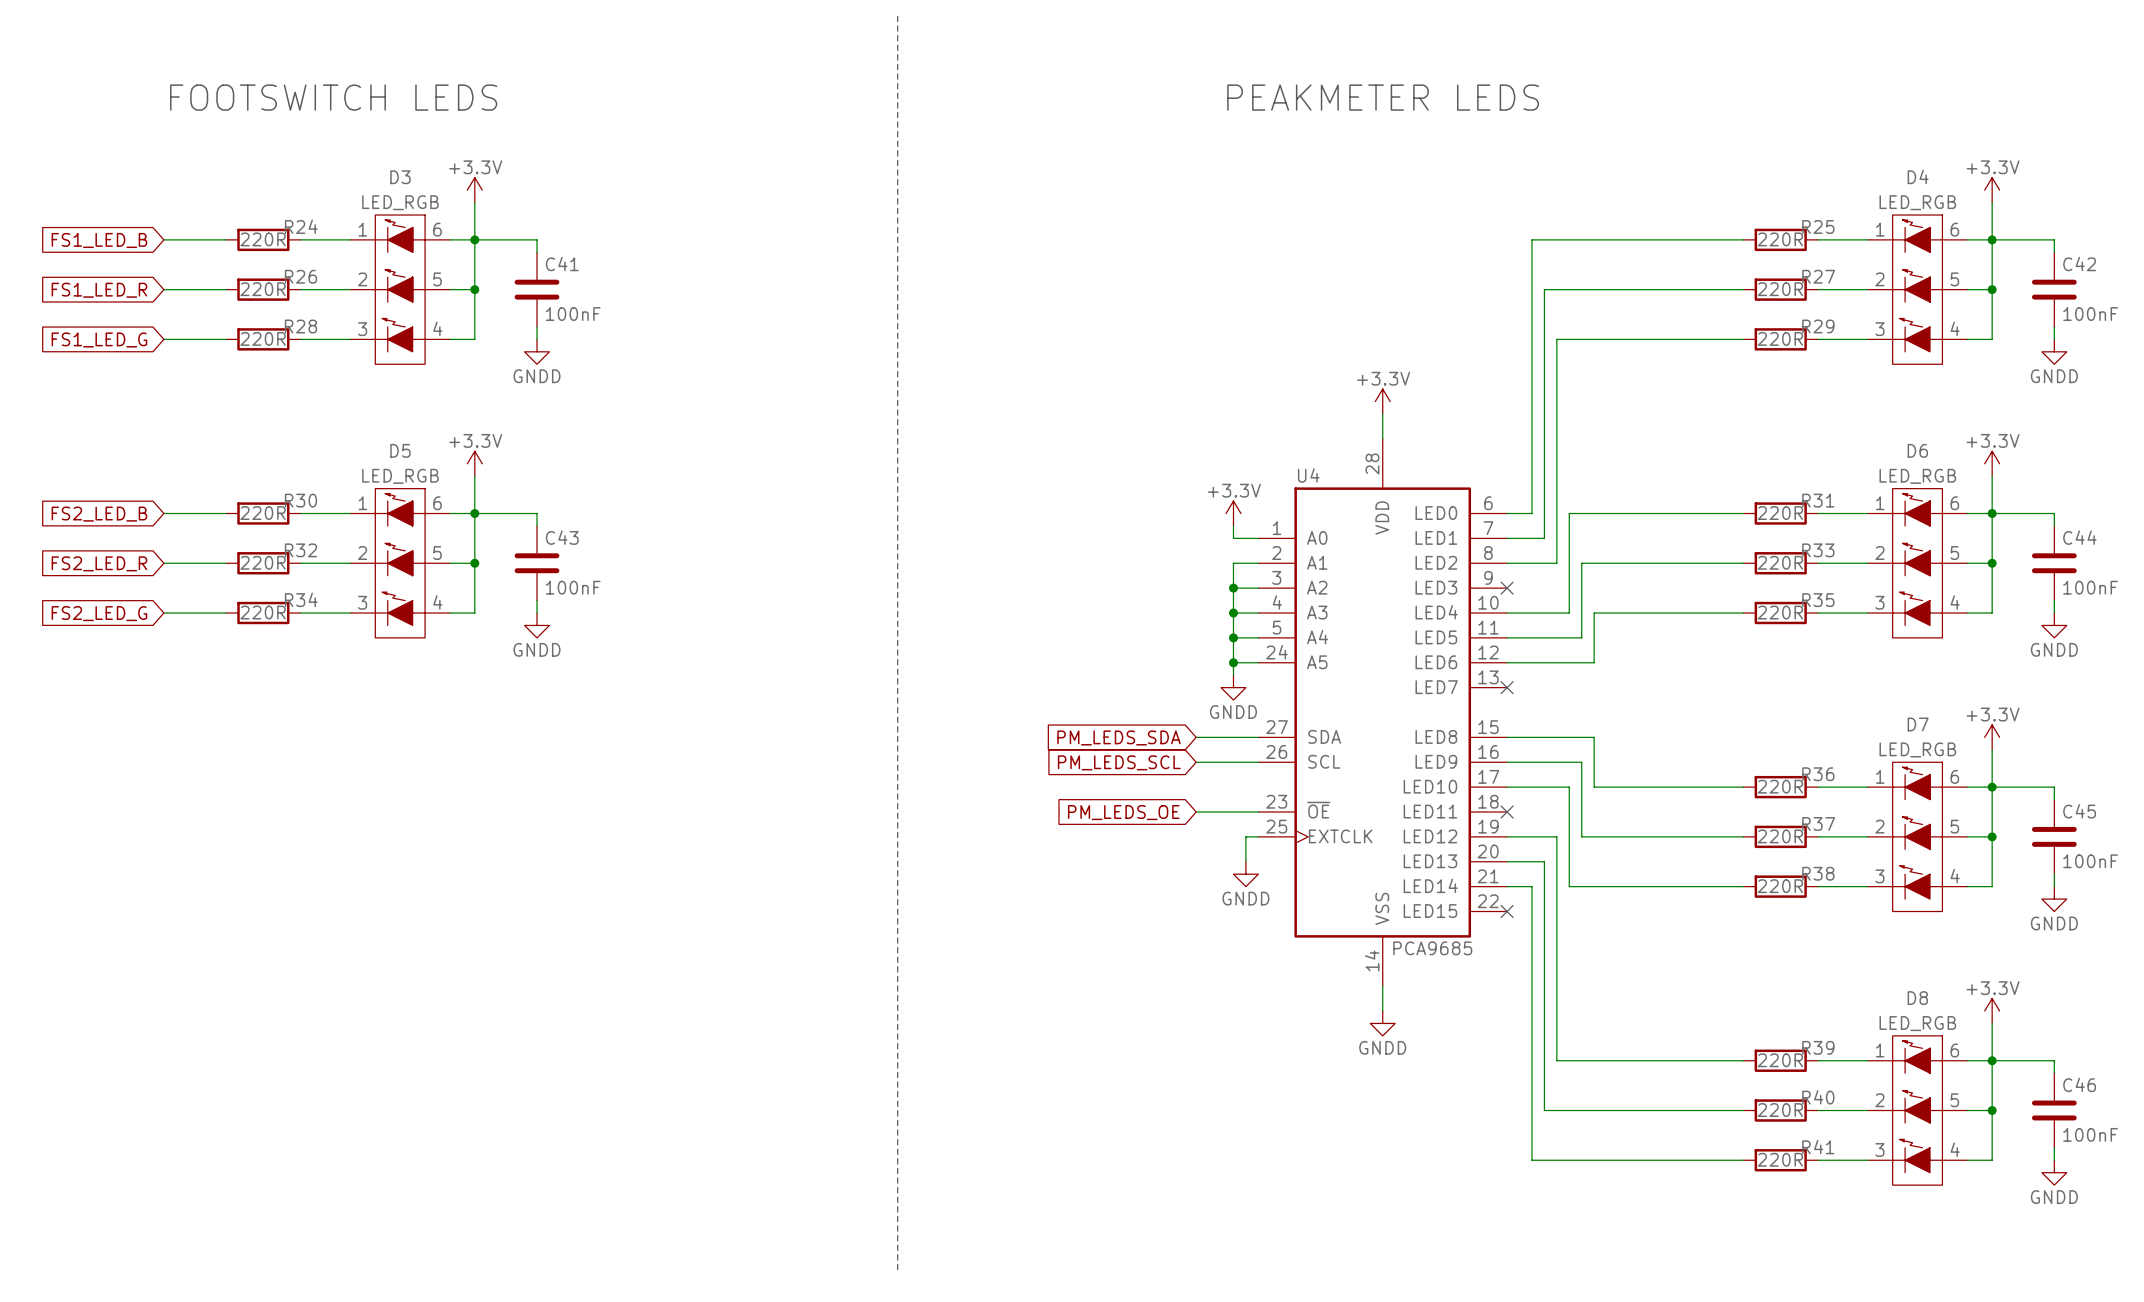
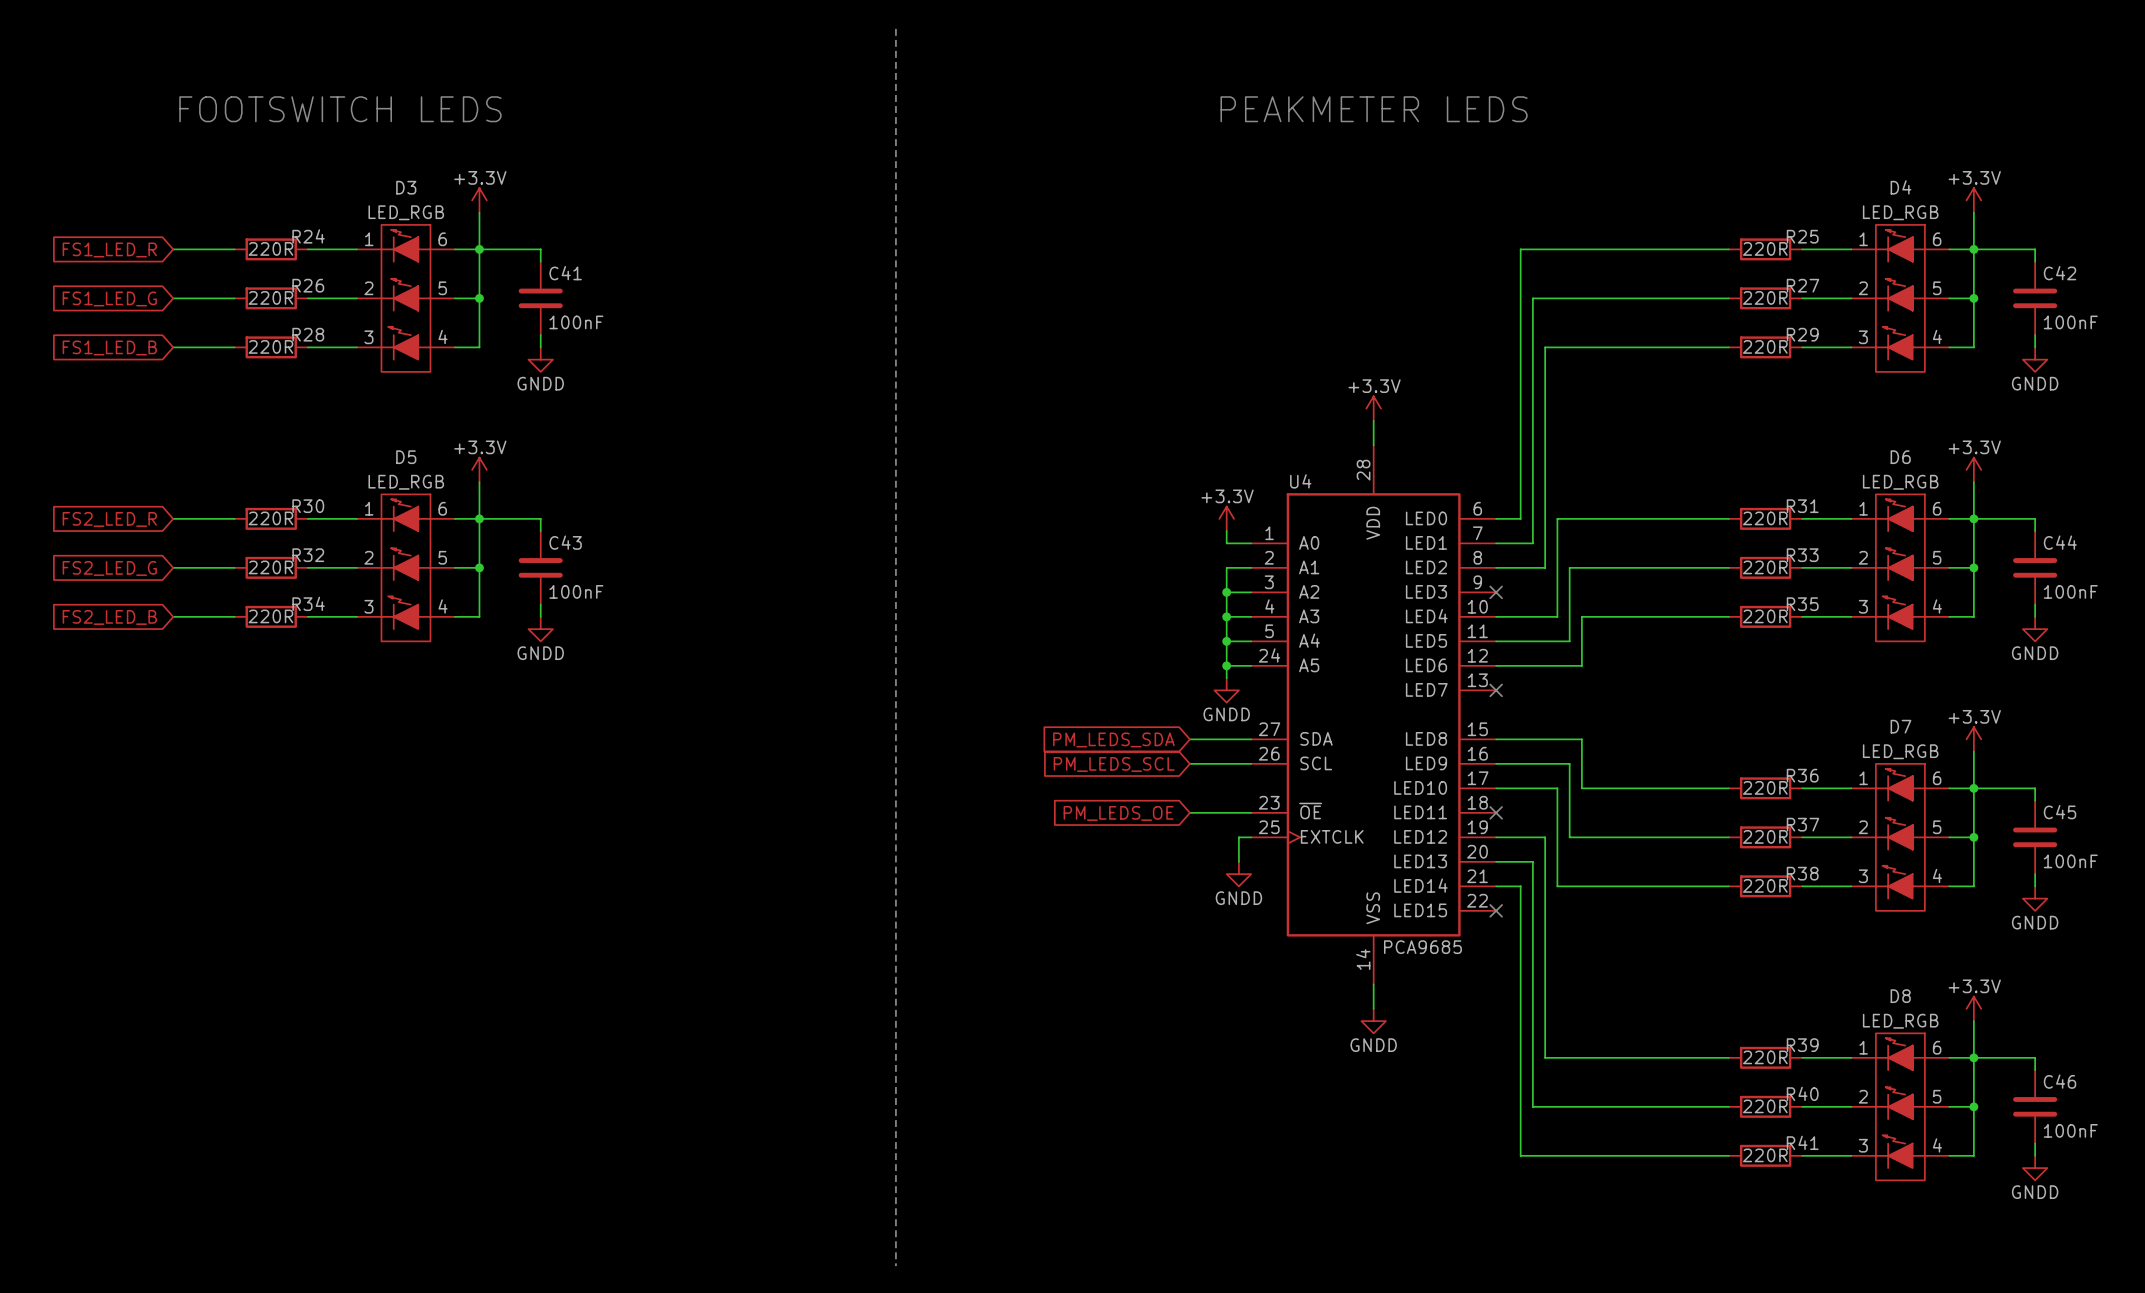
global label: FS1_LED_B (99, 240) -> FS1_LED_R (109, 249)
global label: FS1_LED_R (99, 290) -> FS1_LED_G (109, 298)
global label: FS1_LED_G (99, 339) -> FS1_LED_B (109, 347)
global label: FS2_LED_B (99, 514) -> FS2_LED_R (109, 519)
global label: FS2_LED_R (99, 563) -> FS2_LED_G (109, 568)
global label: FS2_LED_G (99, 613) -> FS2_LED_B (109, 617)

